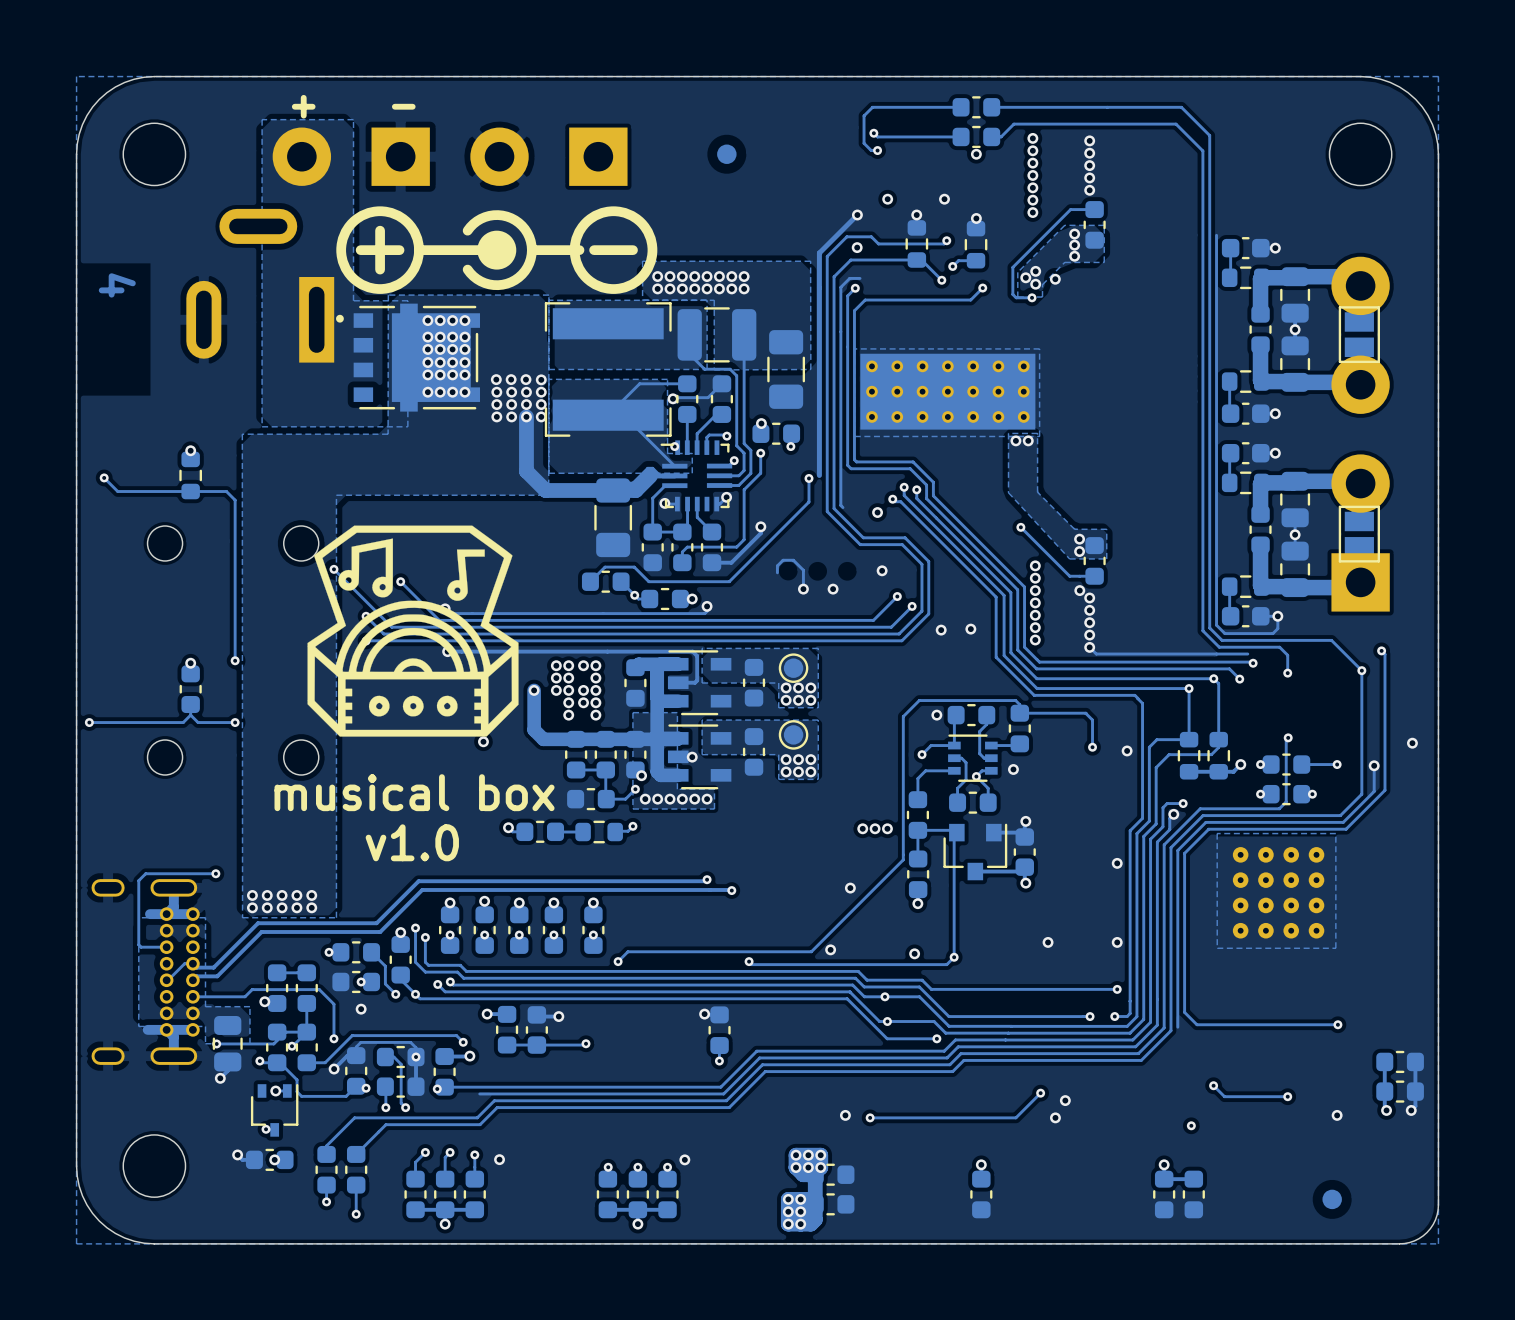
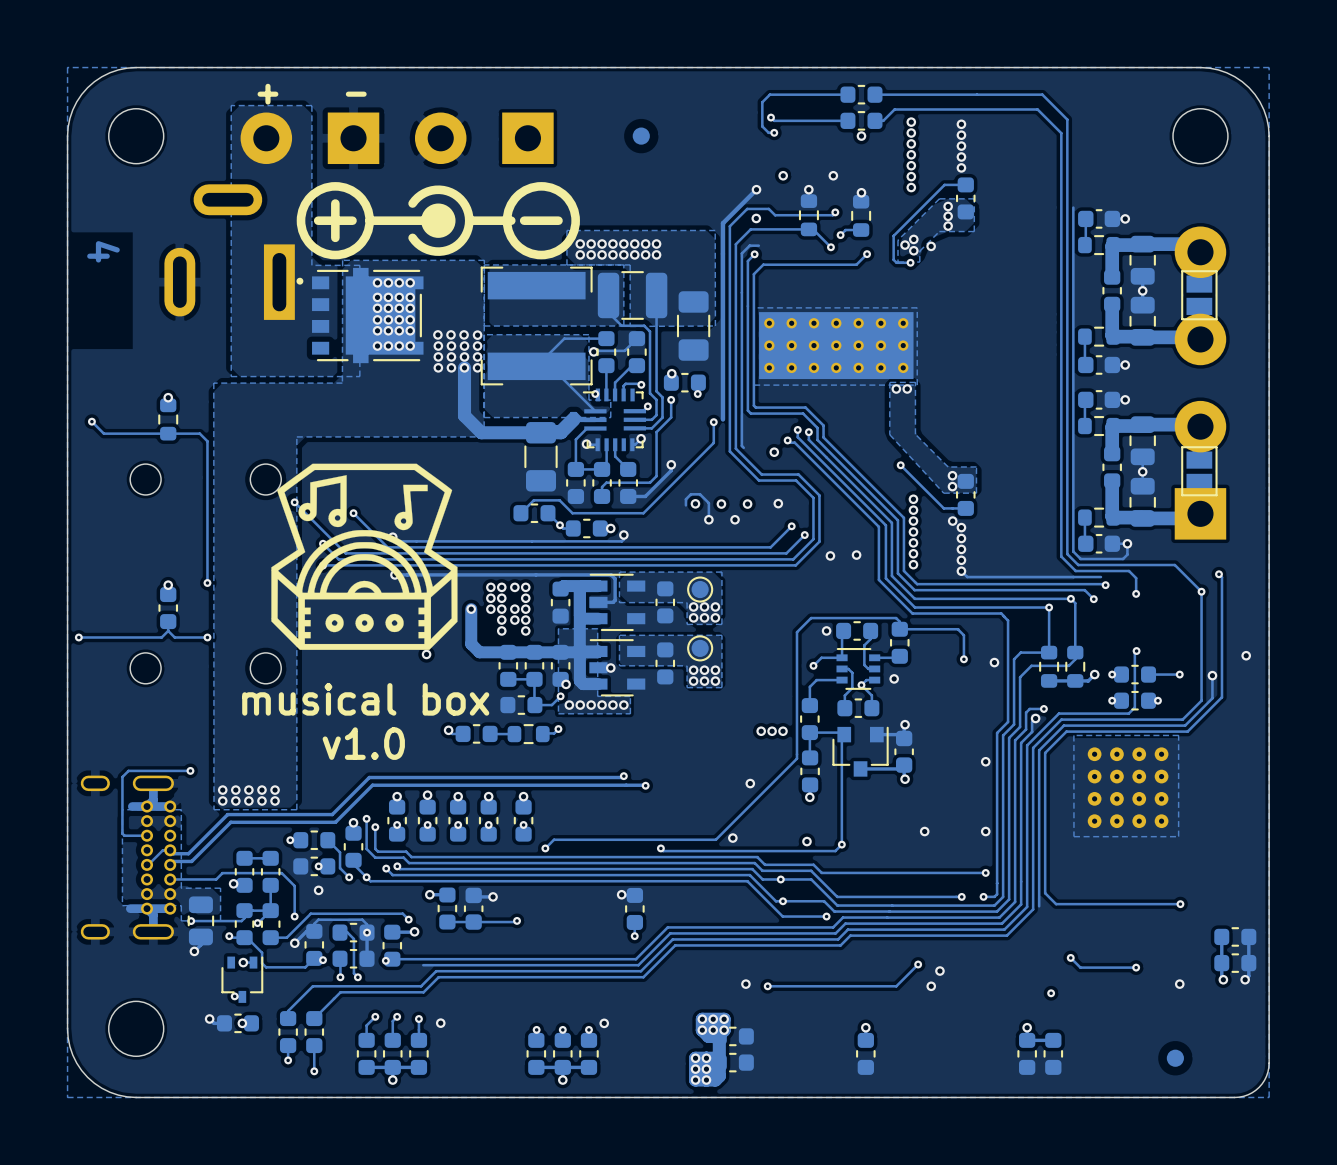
via: none -> (695, 503)
via: none -> (721, 504)
via: none -> (747, 504)

